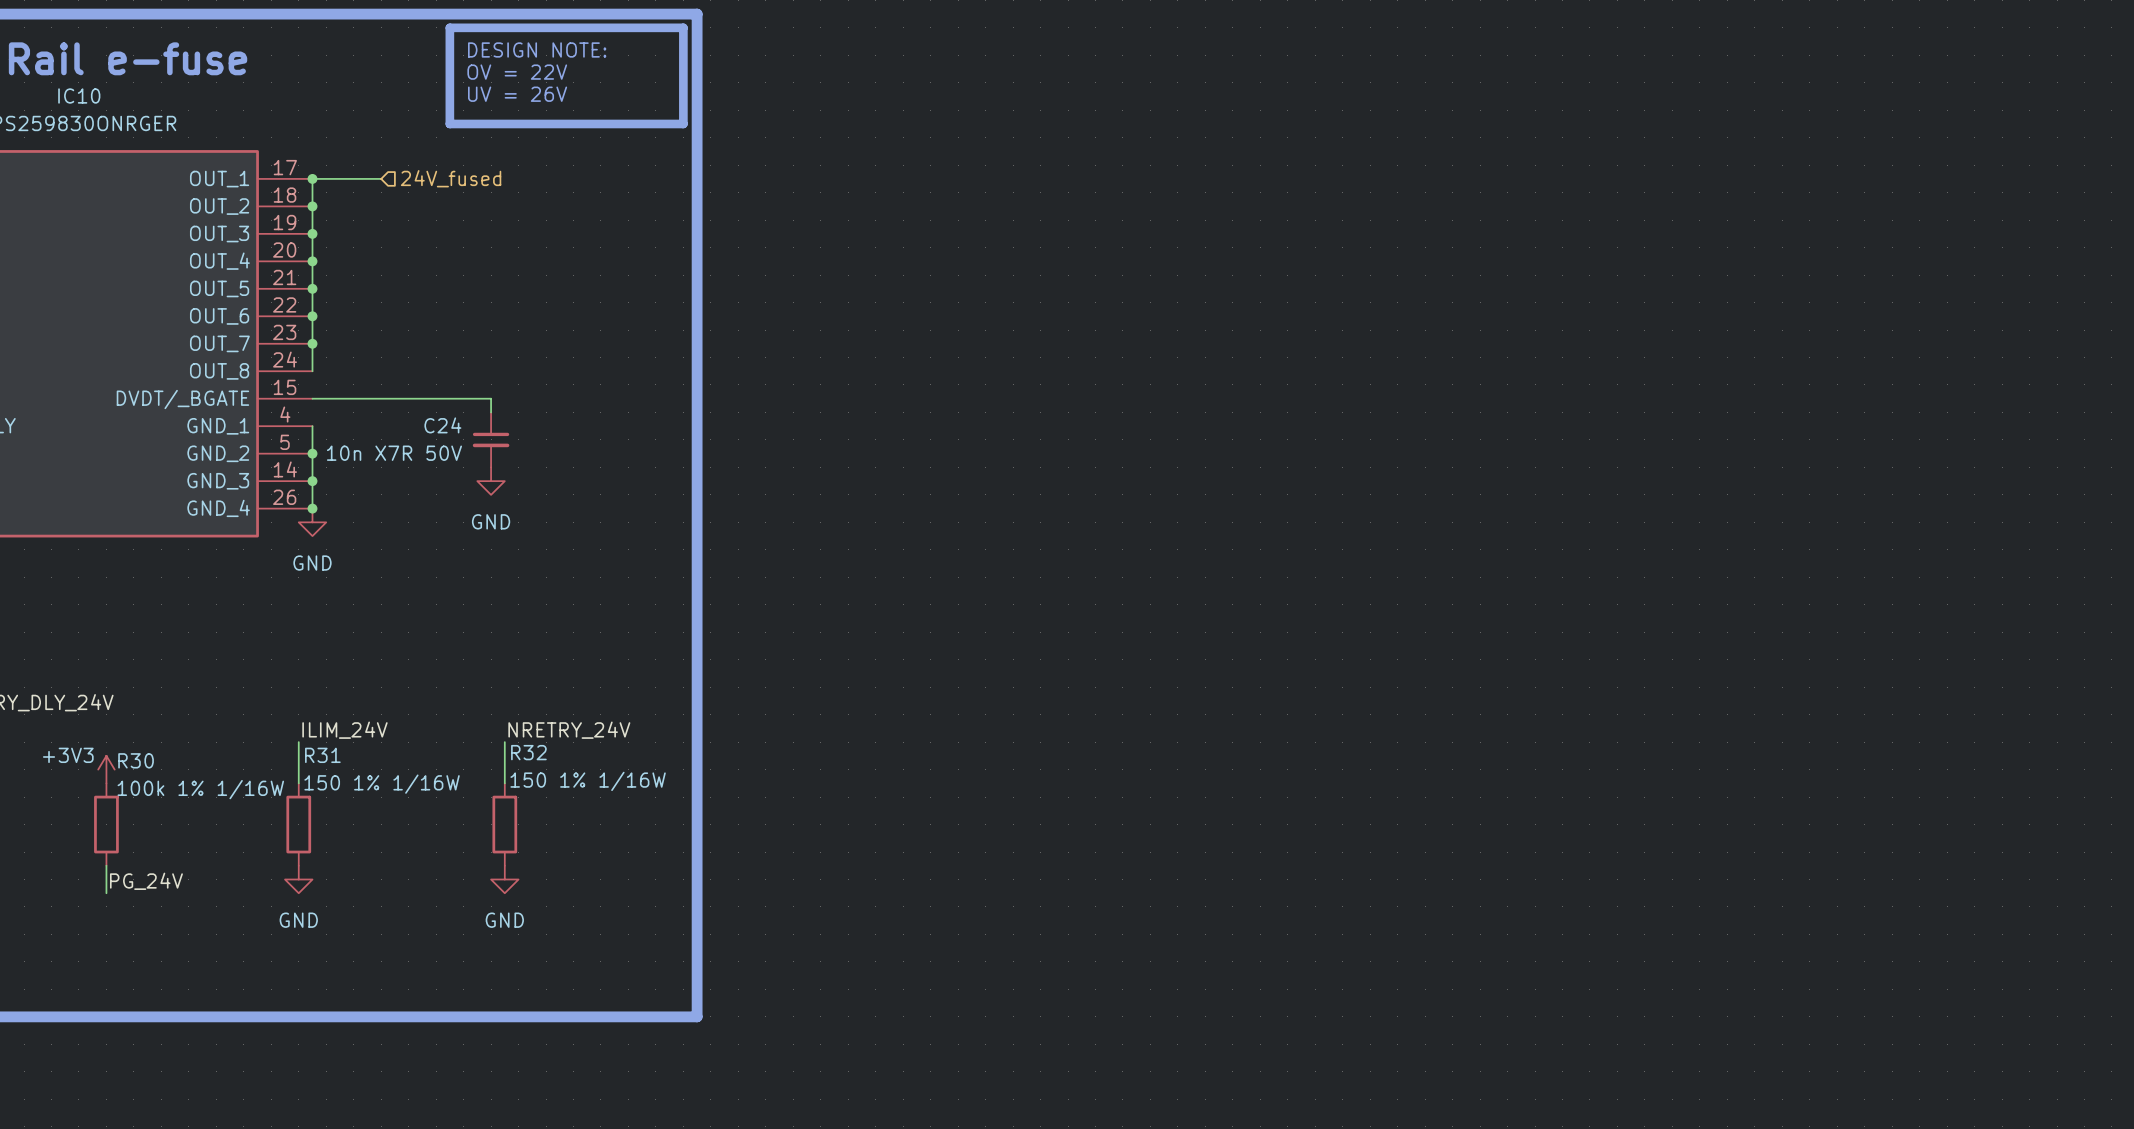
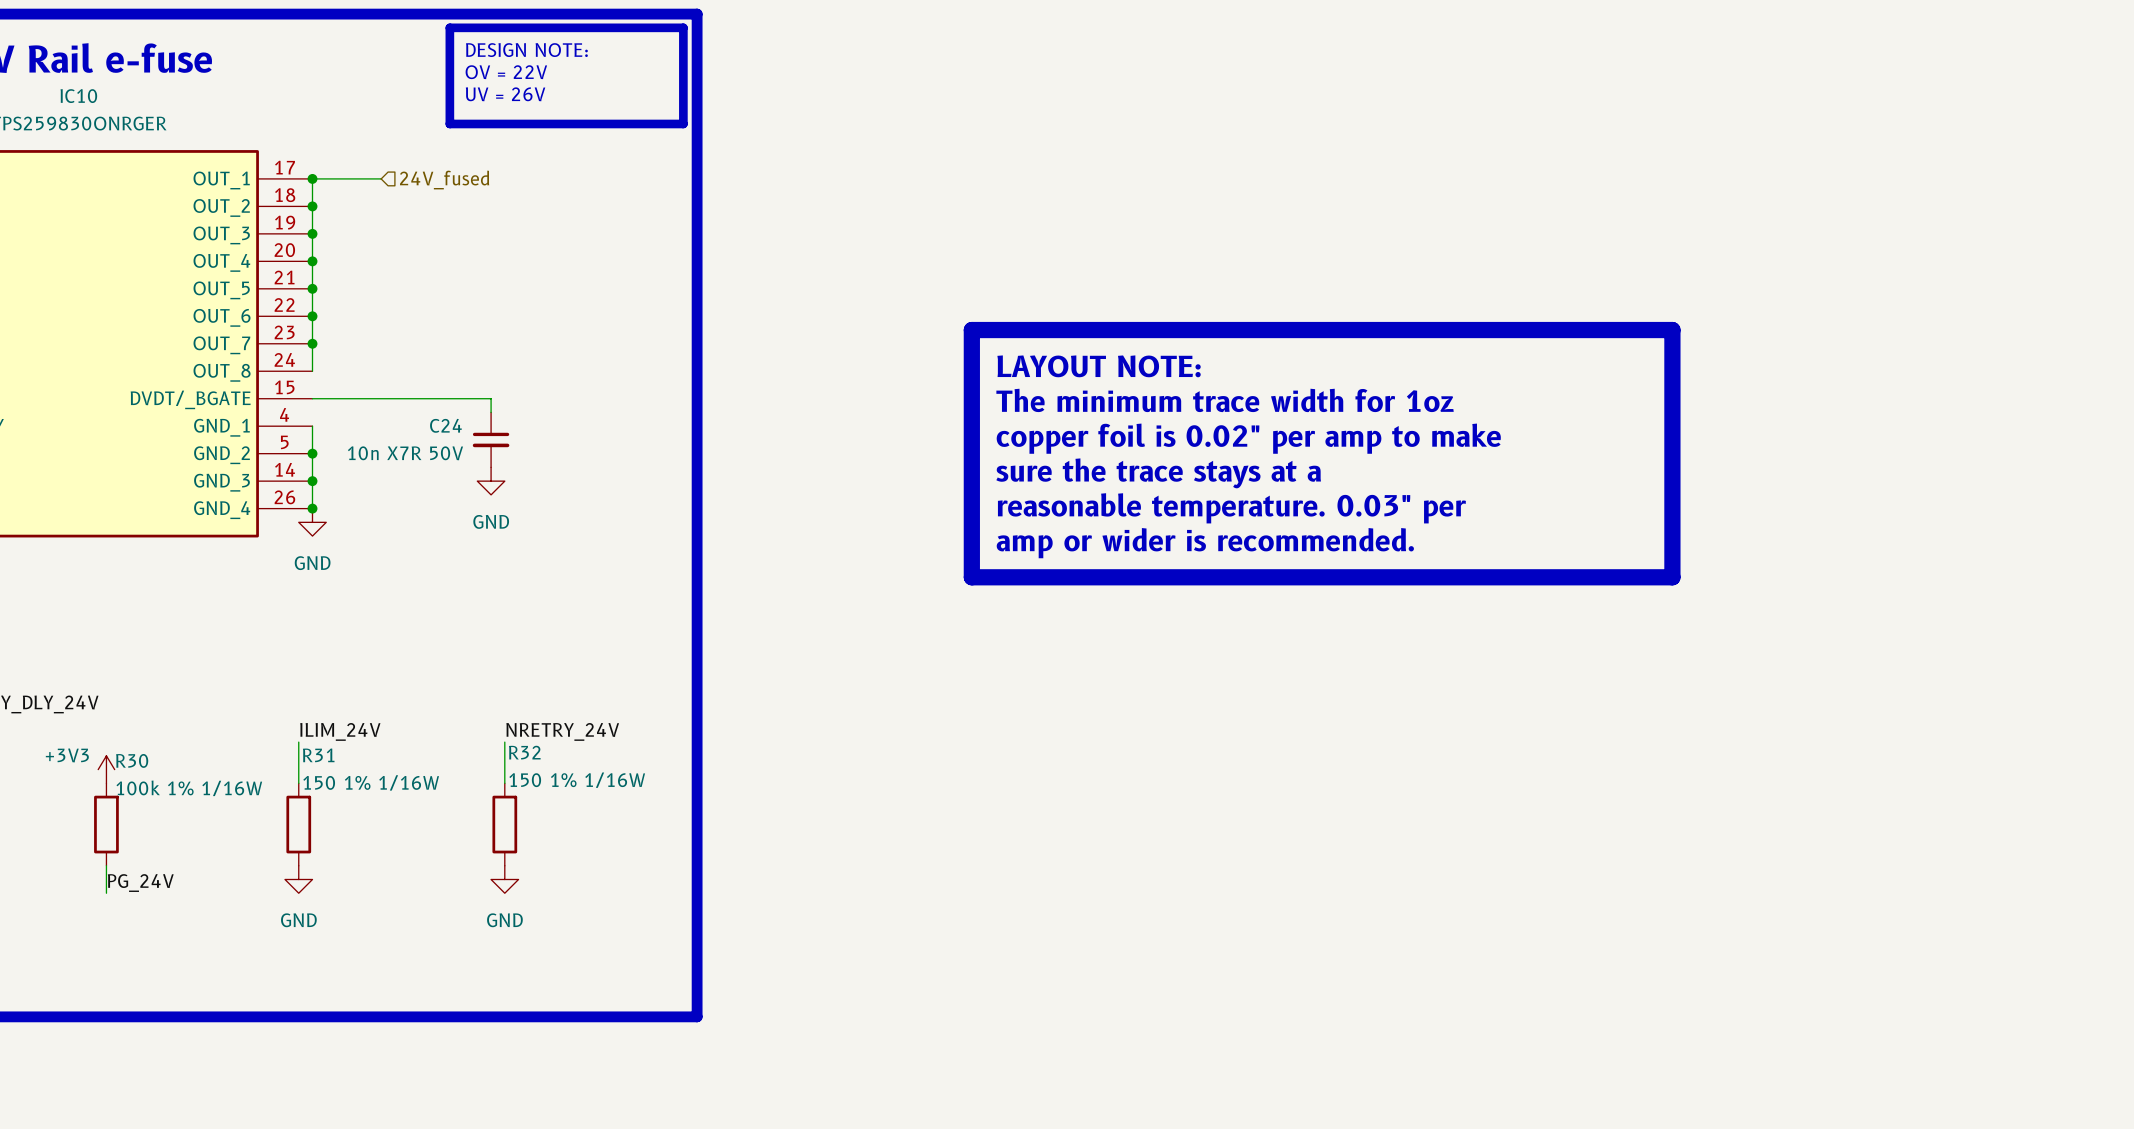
line: none -> (971, 330) (1672, 330) (1672, 577) (971, 577) (971, 330)
text: none -> LAYOUT NOTE: (1099, 366)
text: none -> The minimum trace width for 1oz (1225, 400)
text: none -> copper foil is 0.02" per amp to make (1248, 438)
text: none -> sure the trace stays at a (1158, 473)
text: none -> reasonable temperature. 0.03" per (1231, 508)
text: none -> amp or wider is recommended. (1205, 543)

